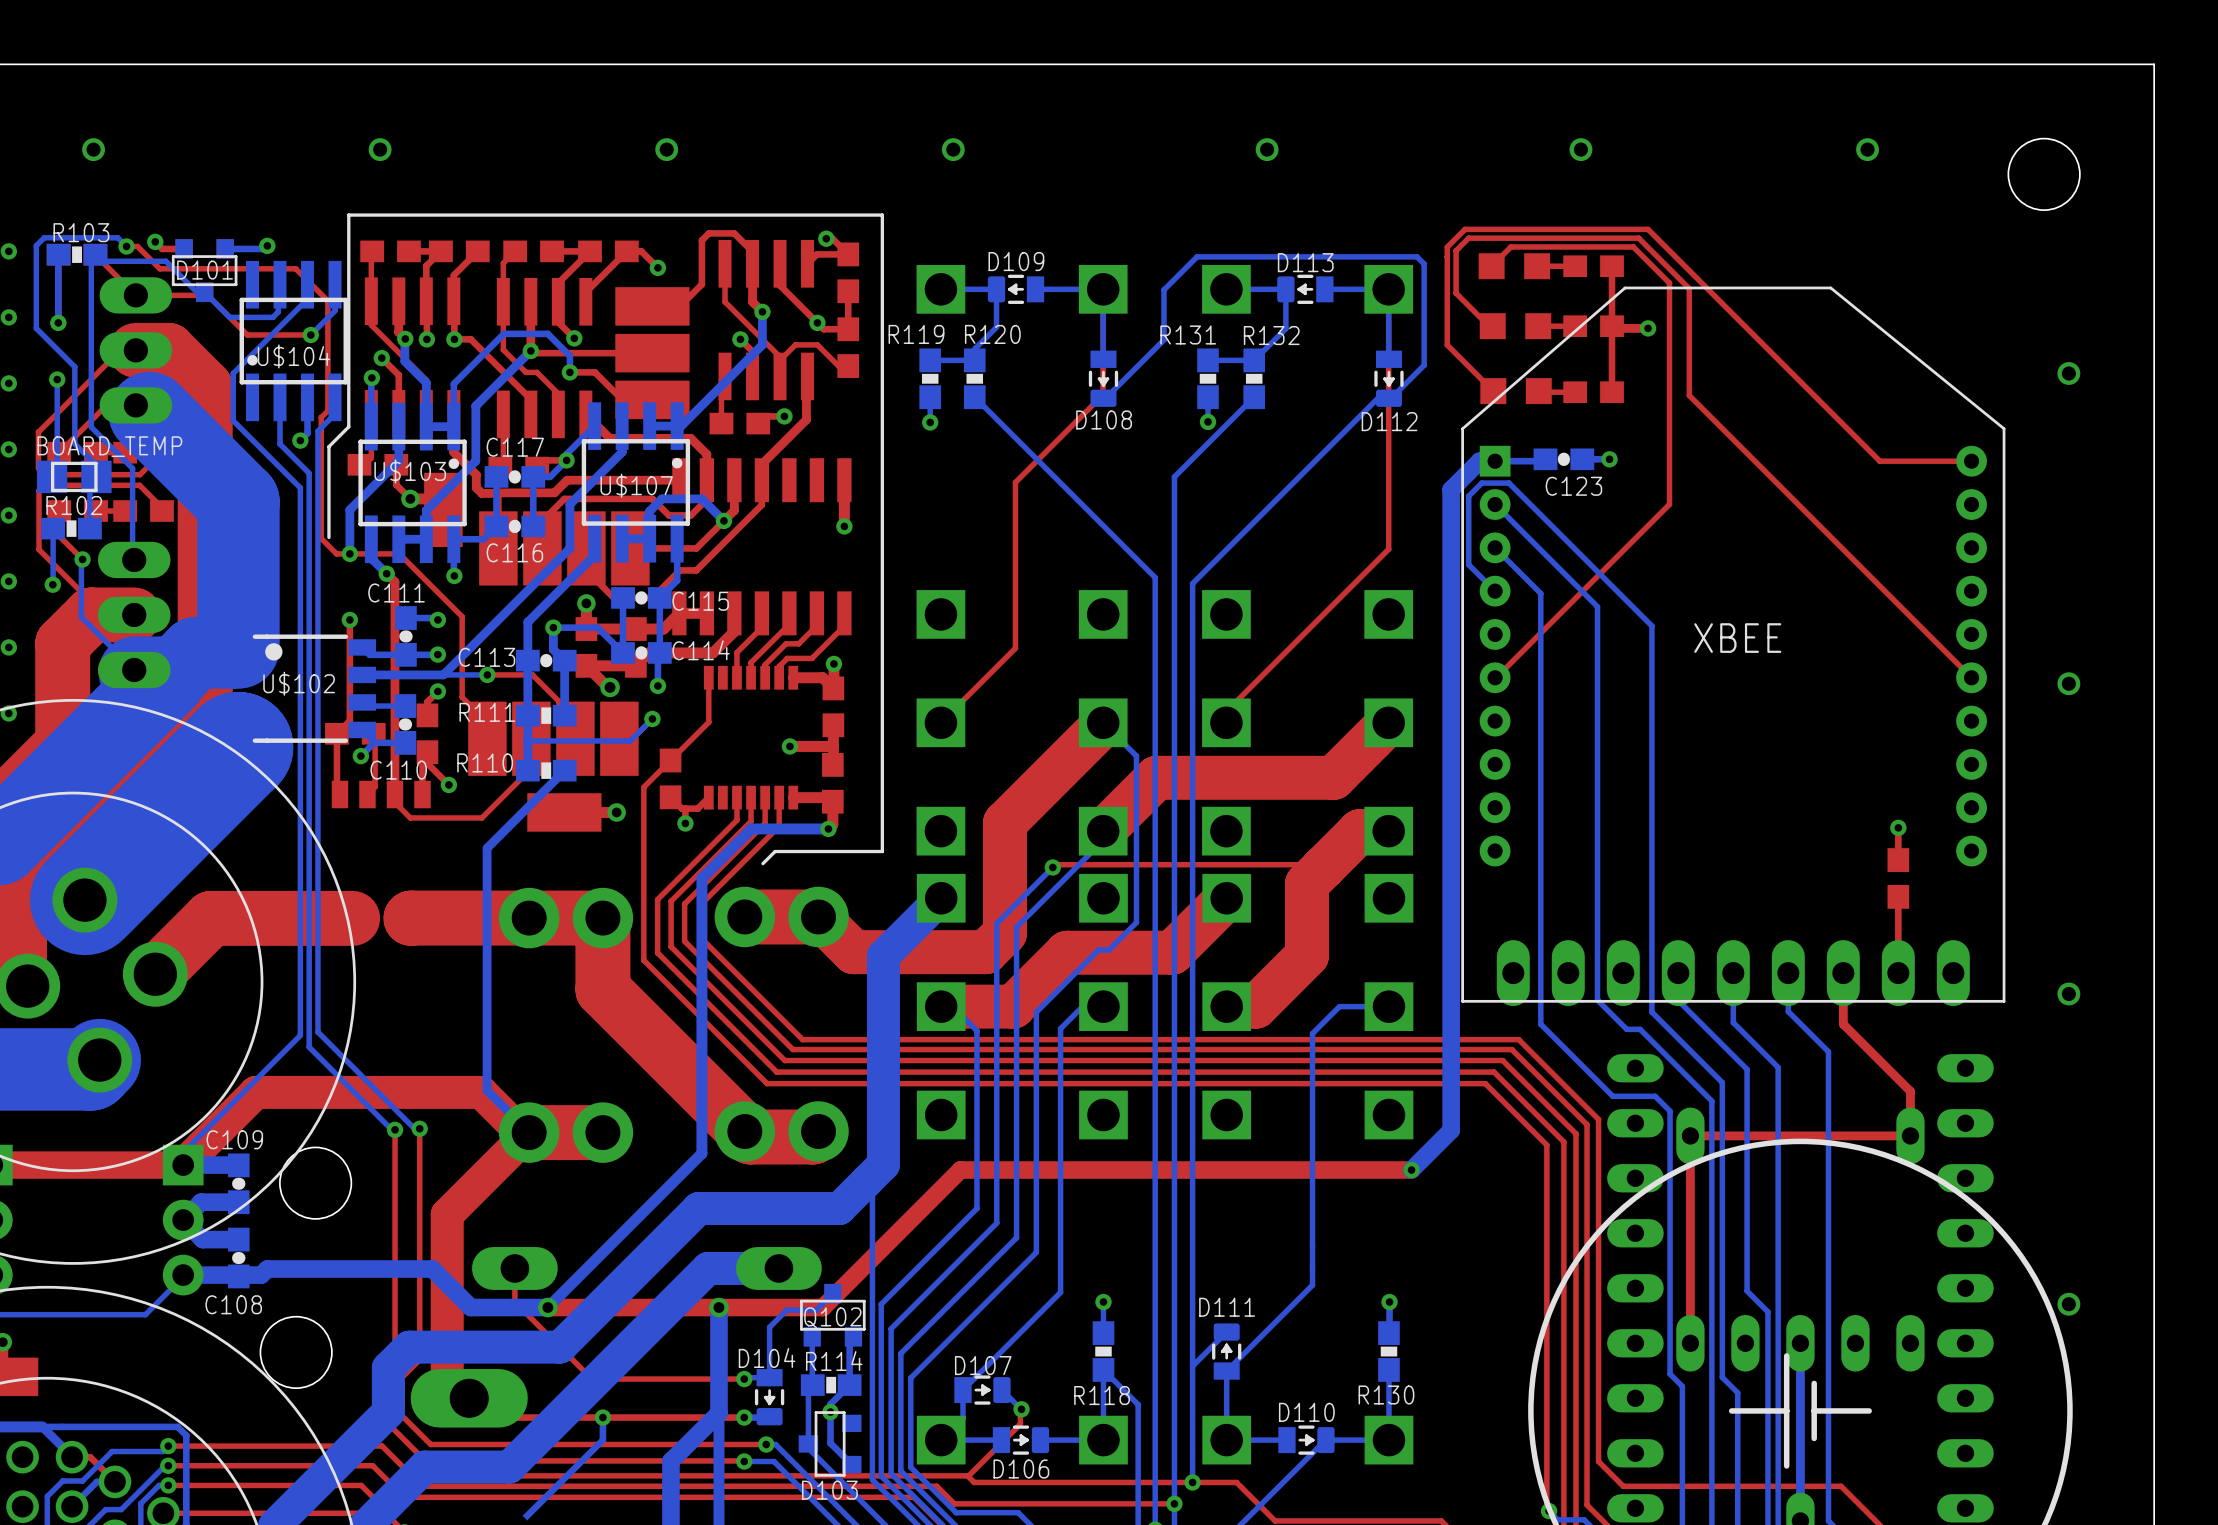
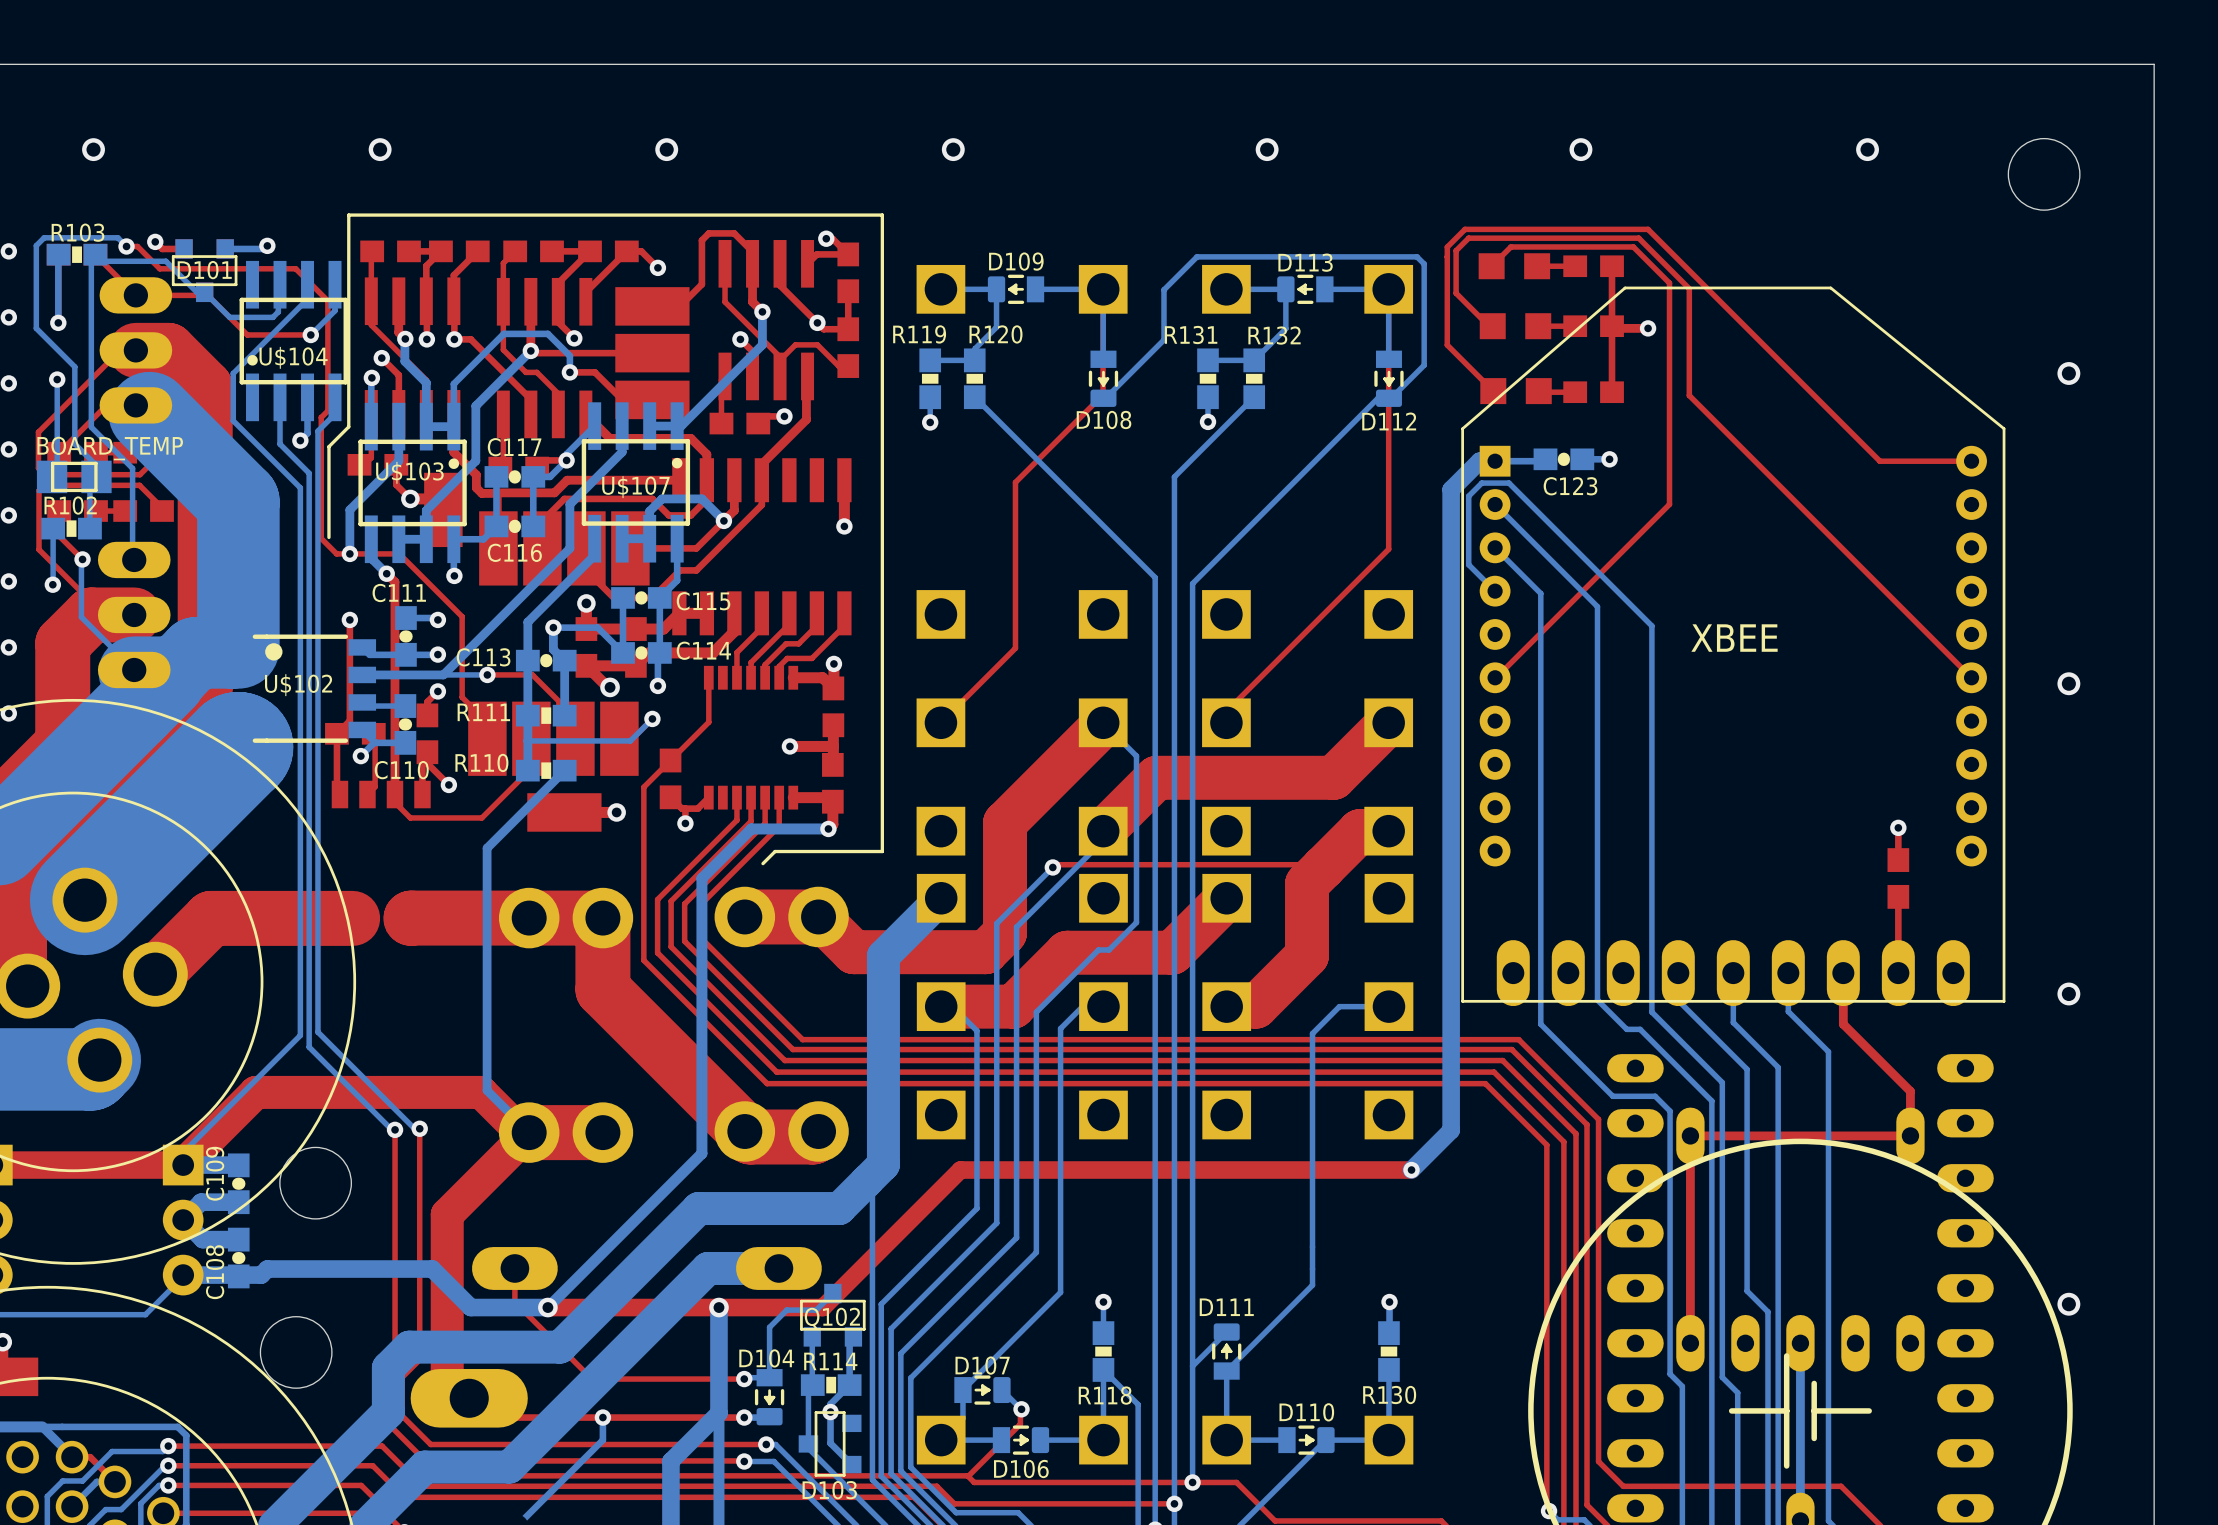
C109 name rotation: 0° (234, 1139) -> 90° counterclockwise (215, 1173)
C108 name rotation: 0° (233, 1304) -> 90° counterclockwise (215, 1272)

